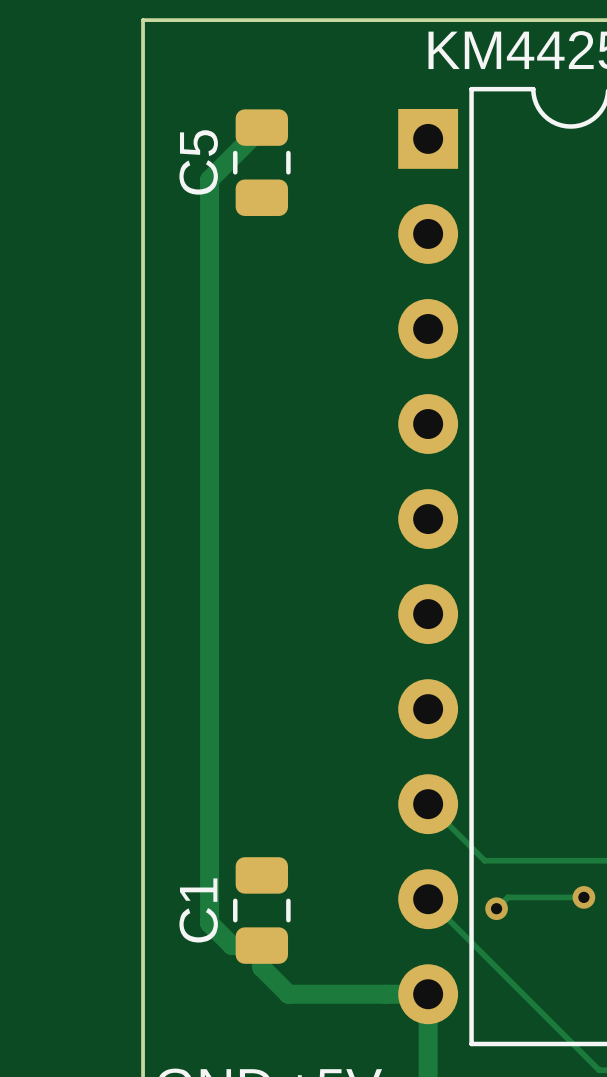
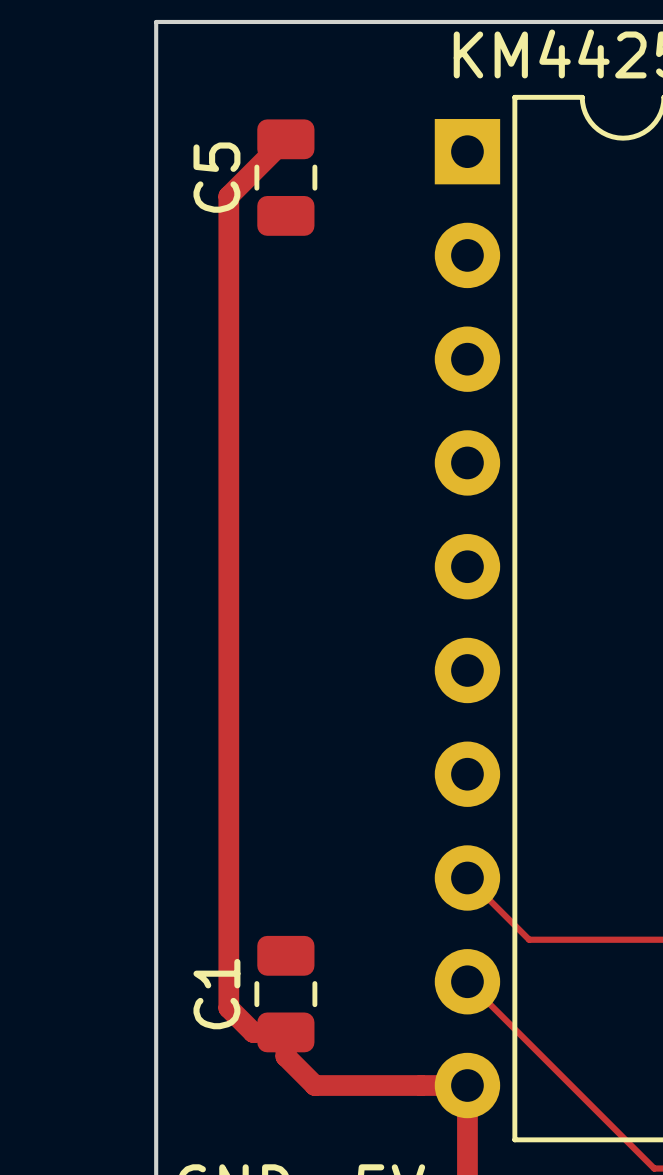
track: (583, 897) (507, 897) (496, 908) -> none
via: (583, 897) -> none
via: (496, 908) -> none

